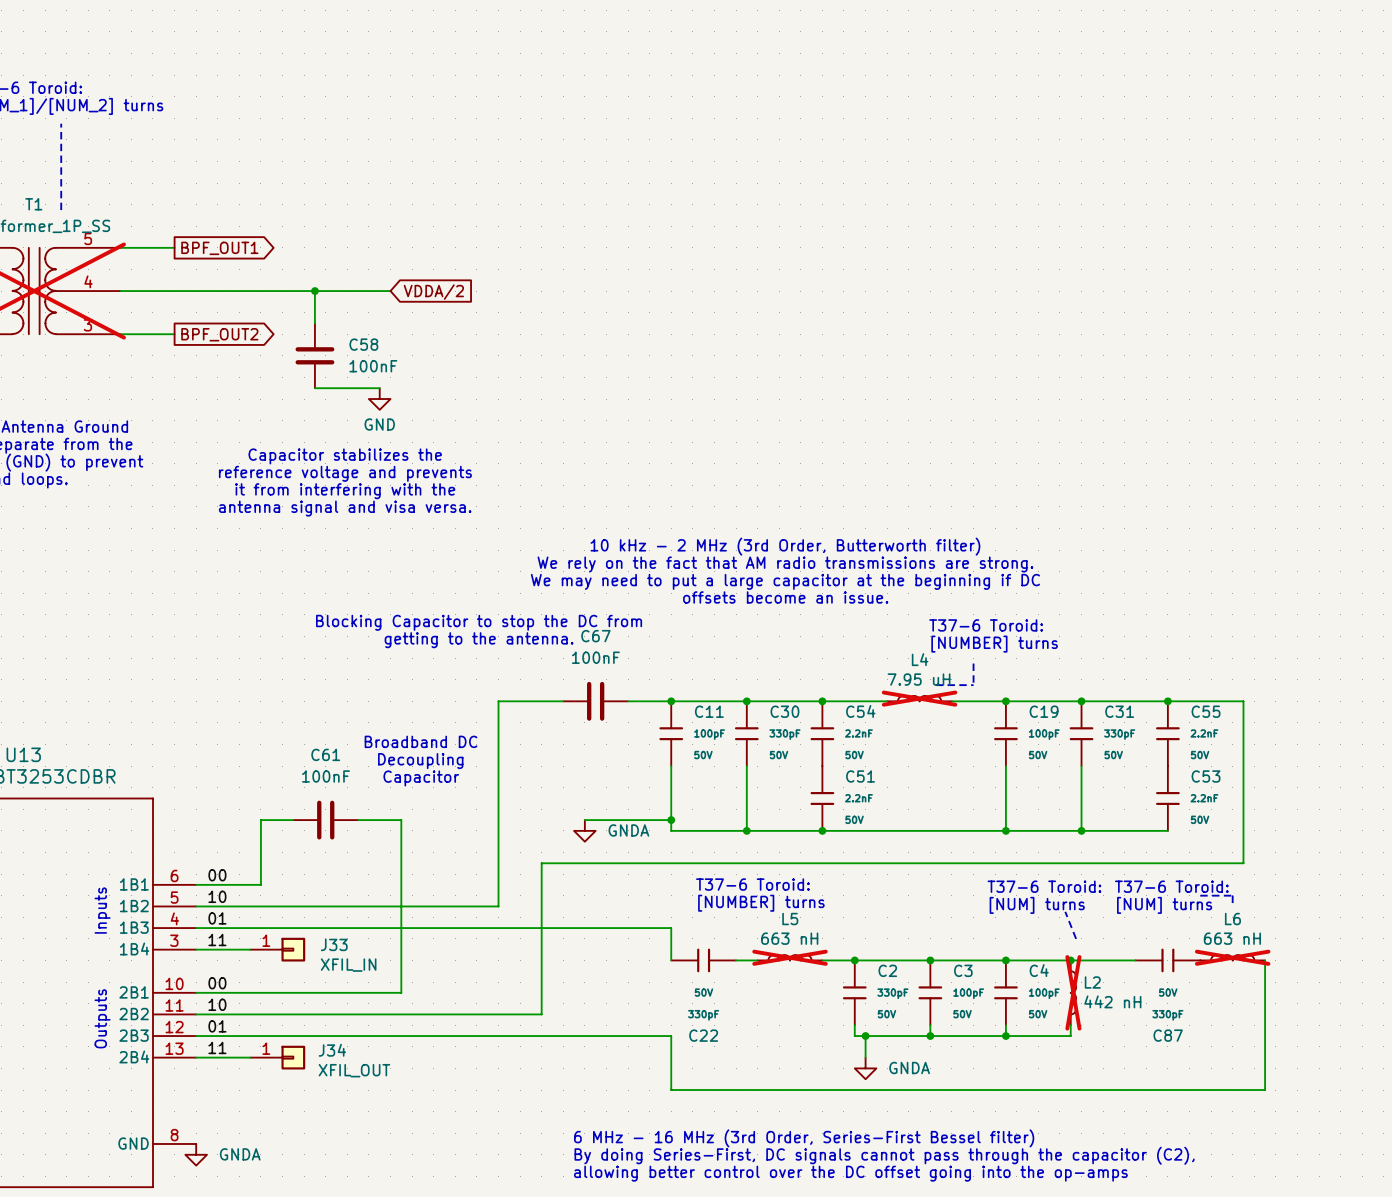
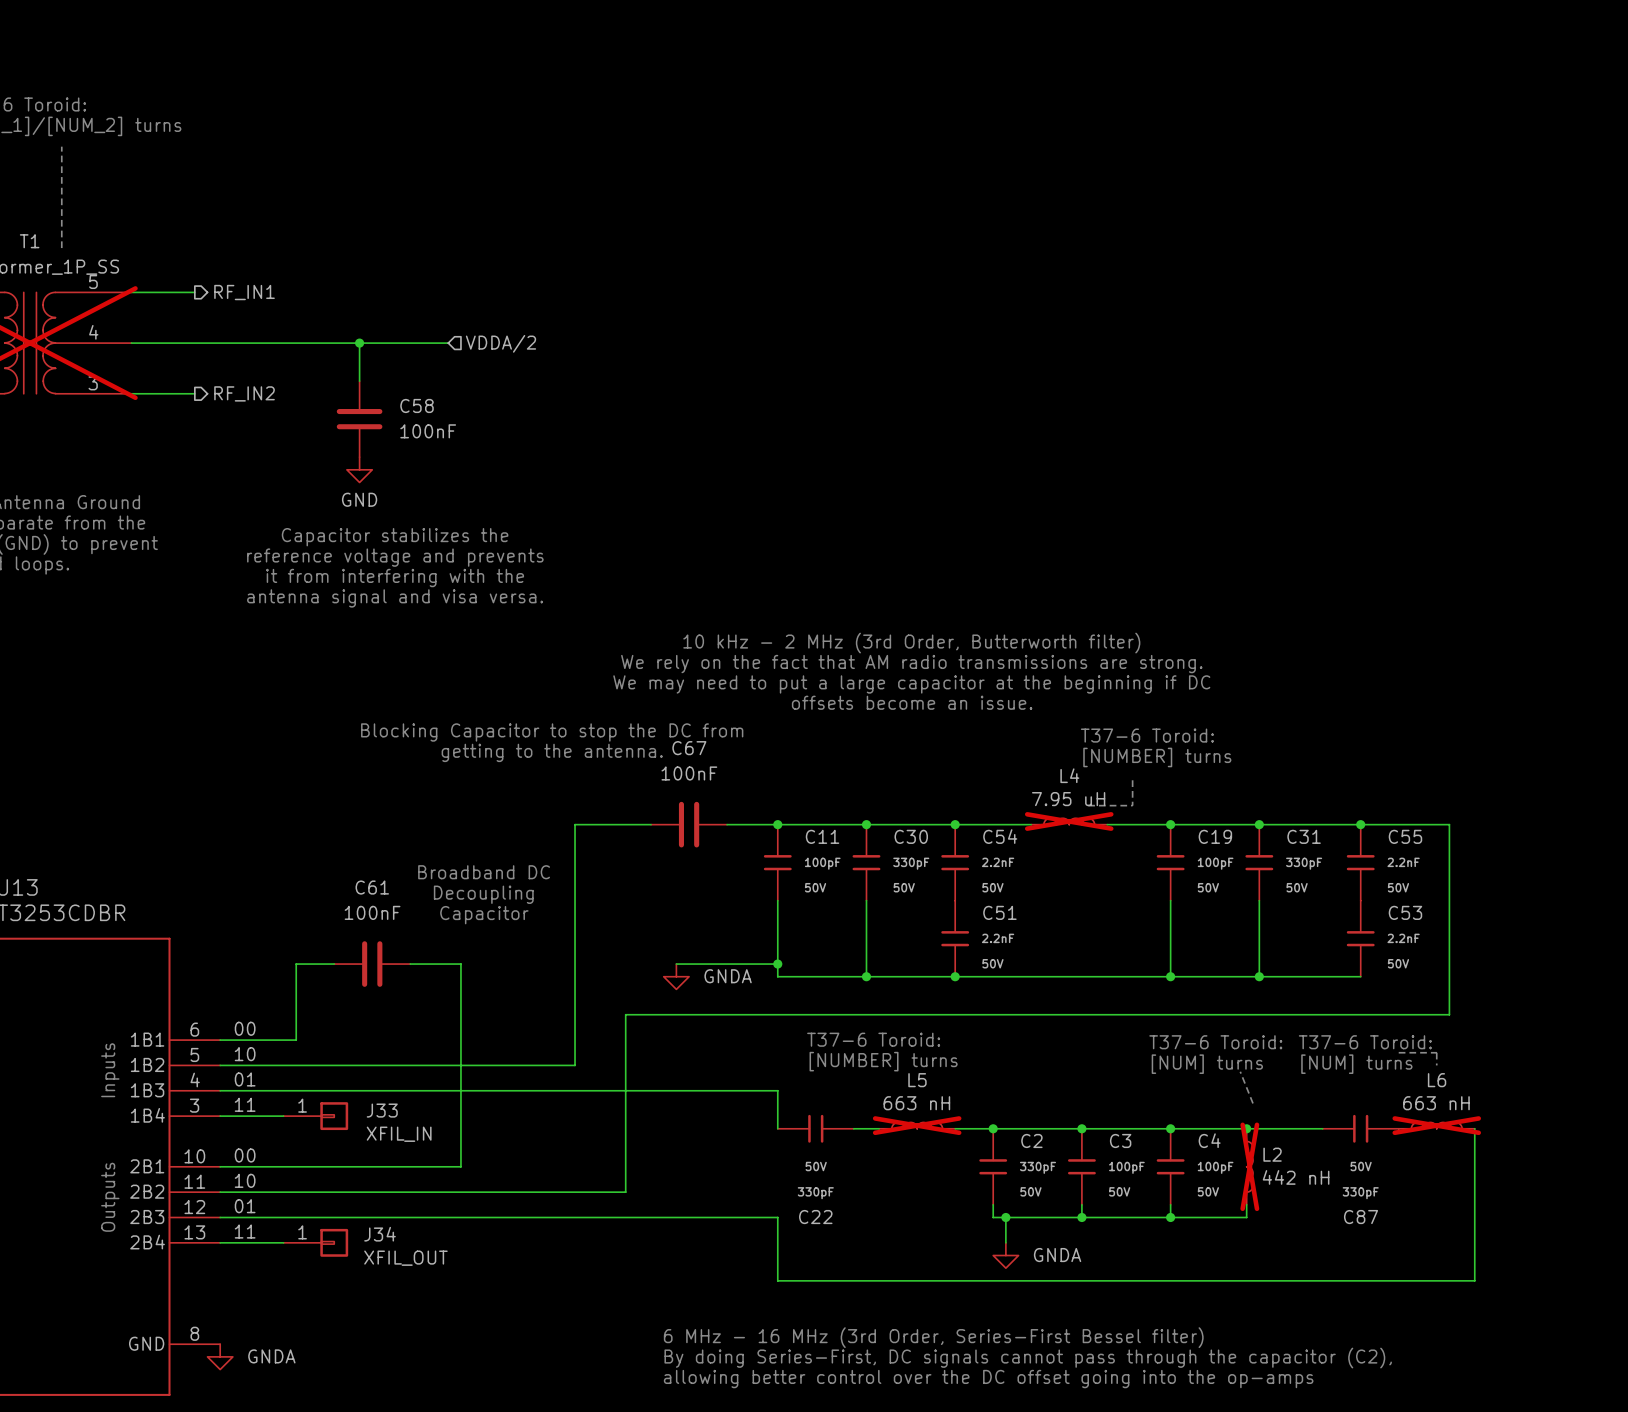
hierarchical label: none -> RF_IN1 (244, 292)
global label: BPF_OUT1 (219, 248) -> none
hierarchical label: none -> VDDA/2 (500, 343)
global label: VDDA/2 (433, 292) -> none
hierarchical label: none -> RF_IN2 (244, 393)
global label: BPF_OUT2 (219, 334) -> none
wire: (314, 388) (379, 388) -> none
power symbol position: GND (379, 399) -> GND (359, 469)

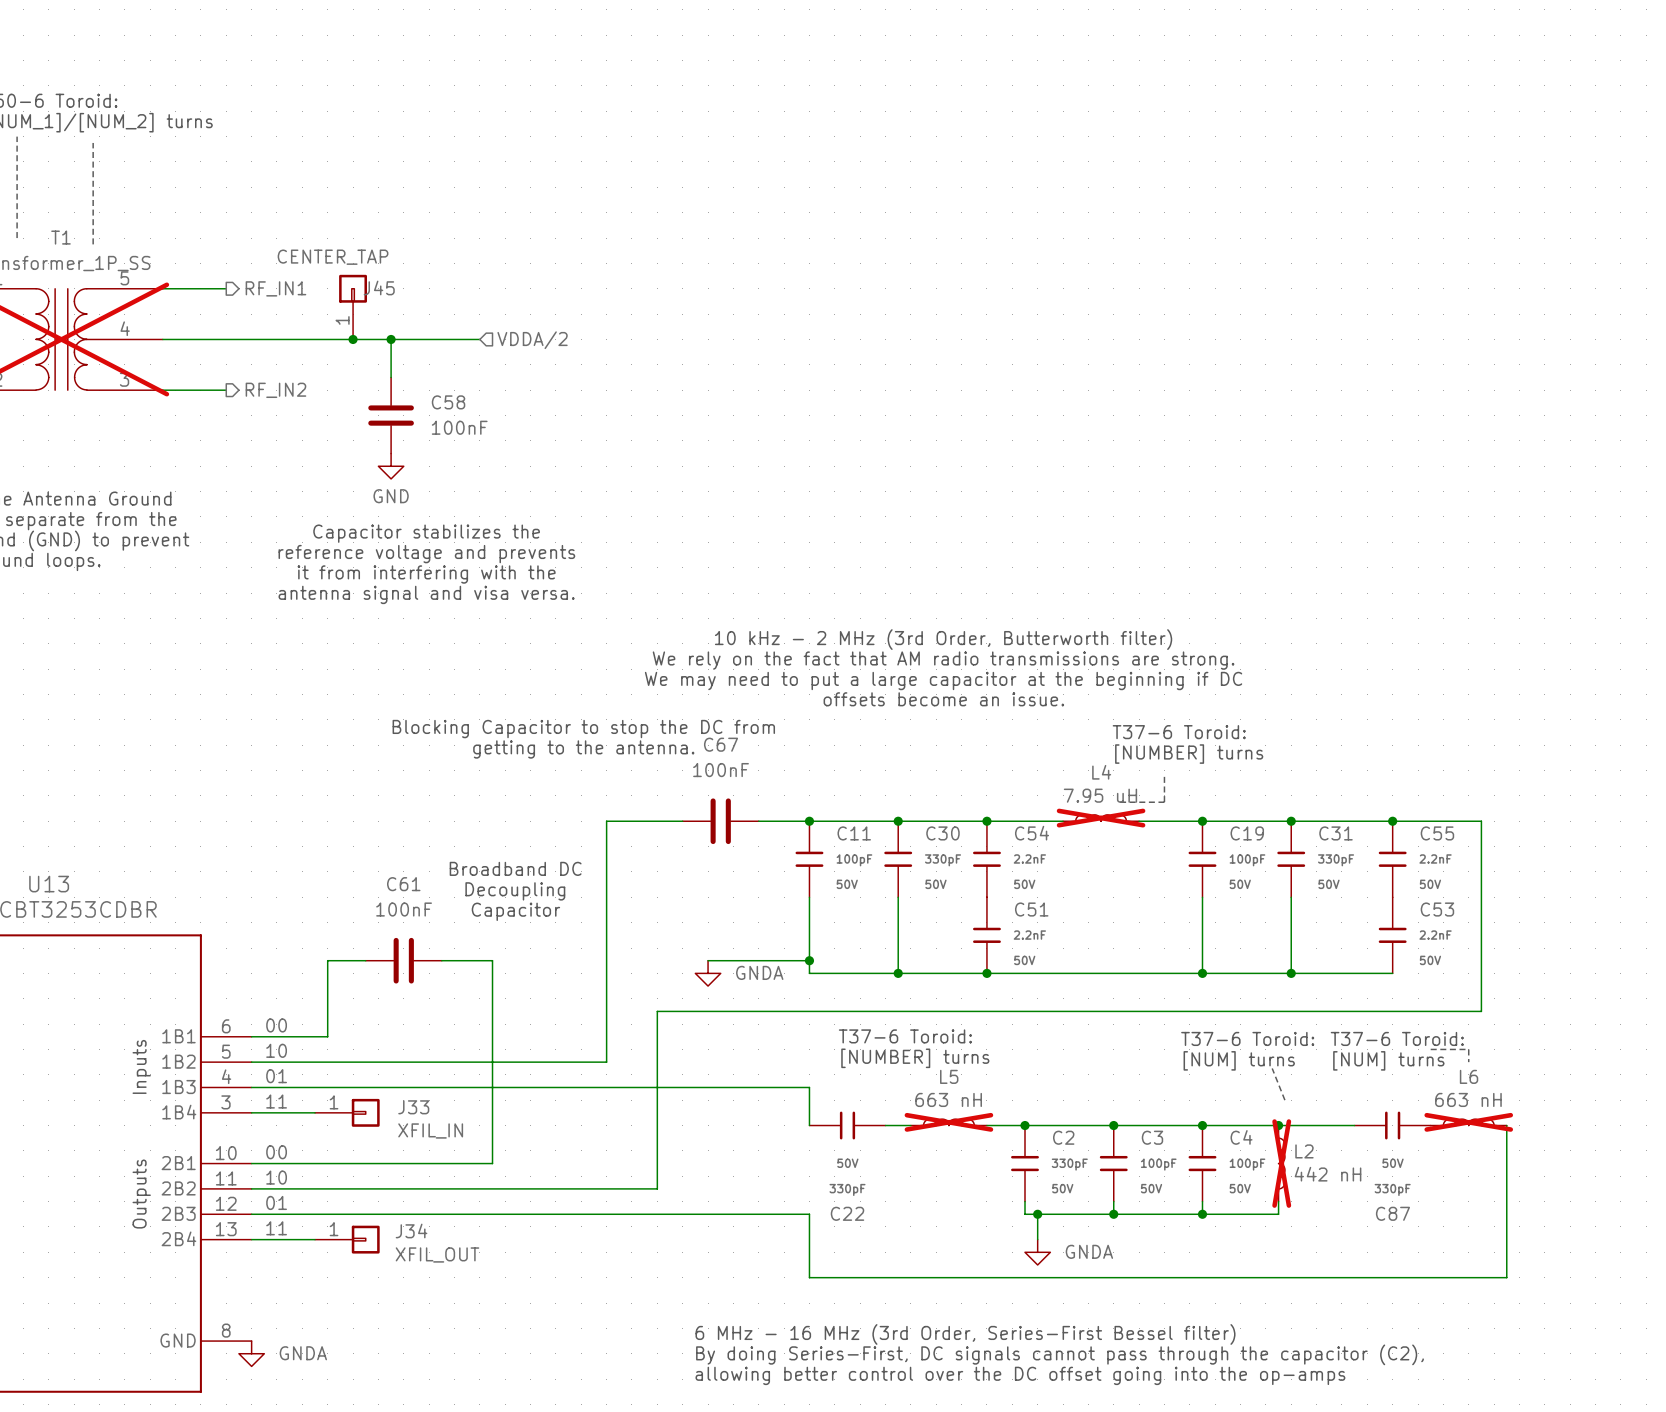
J45: none -> CENTER_TAP (353, 307)
junction: none -> (353, 339)

